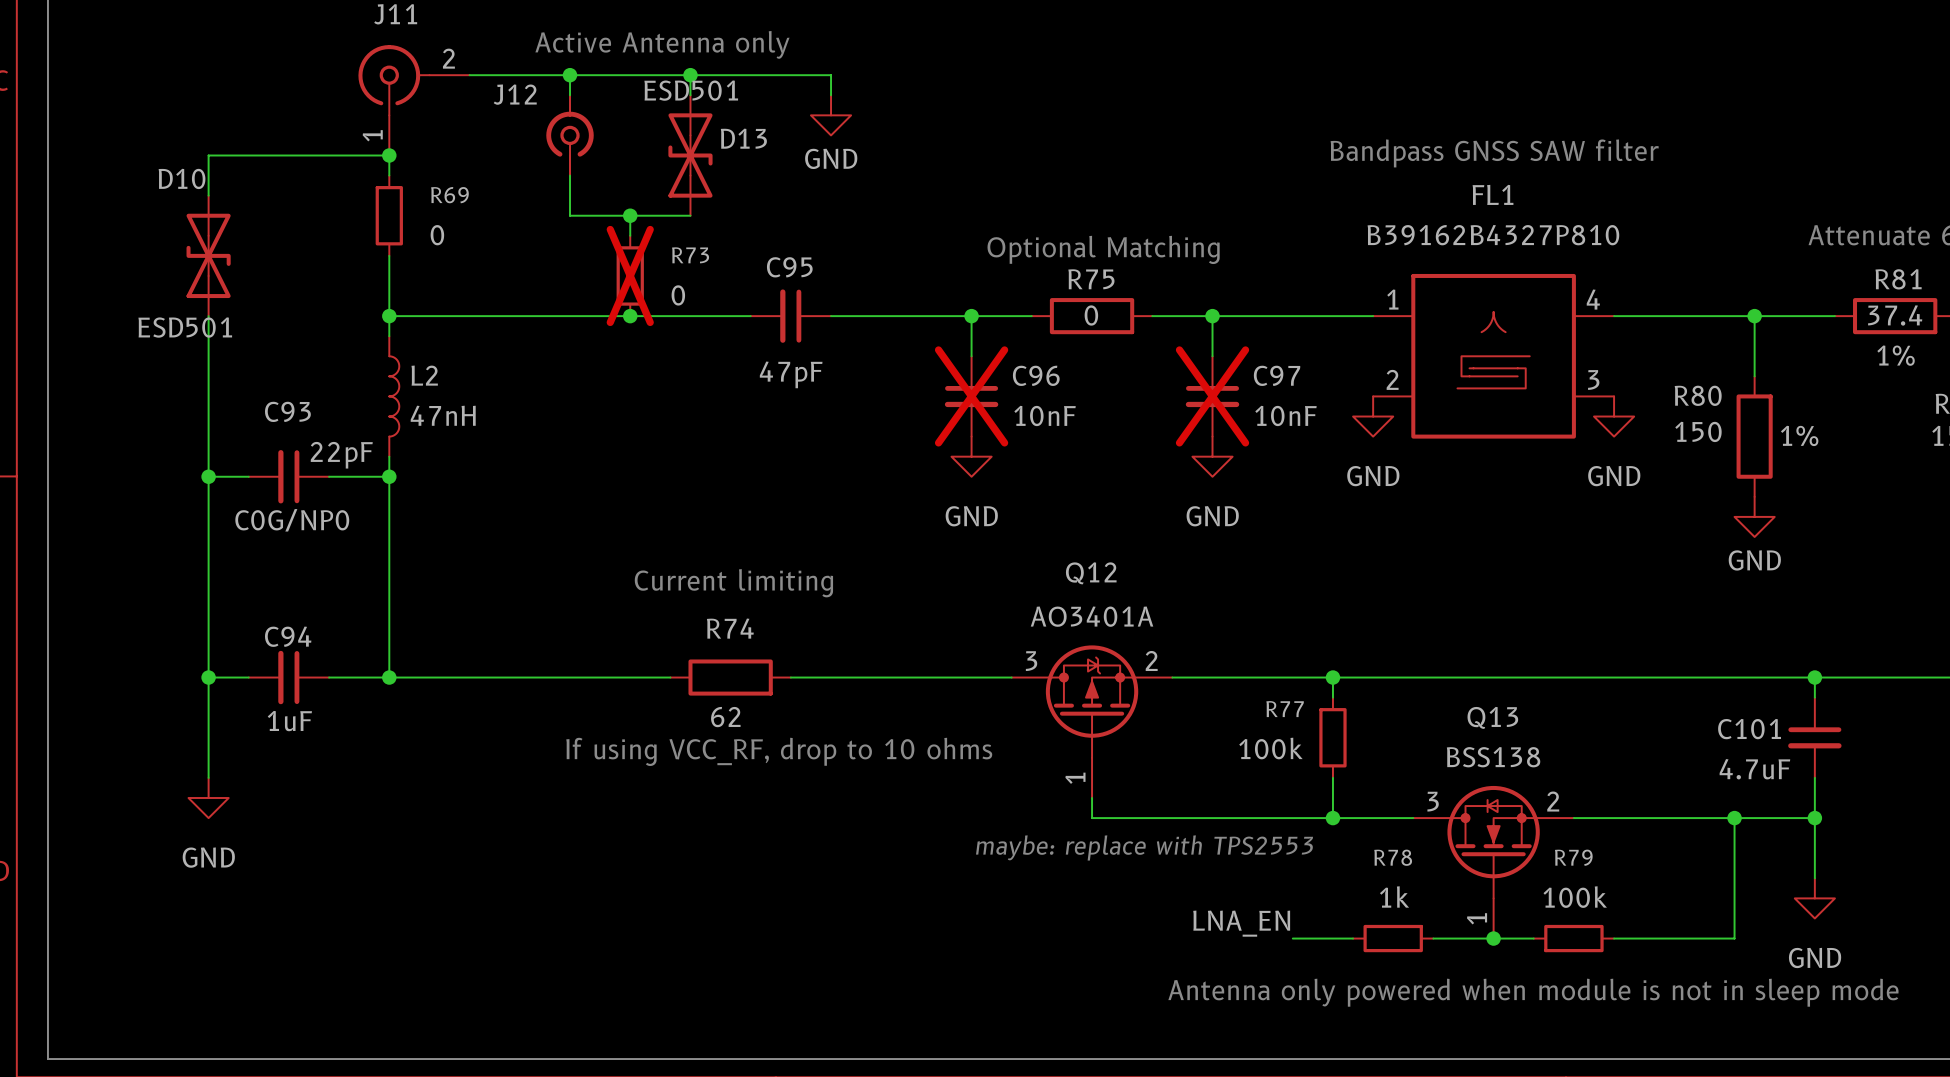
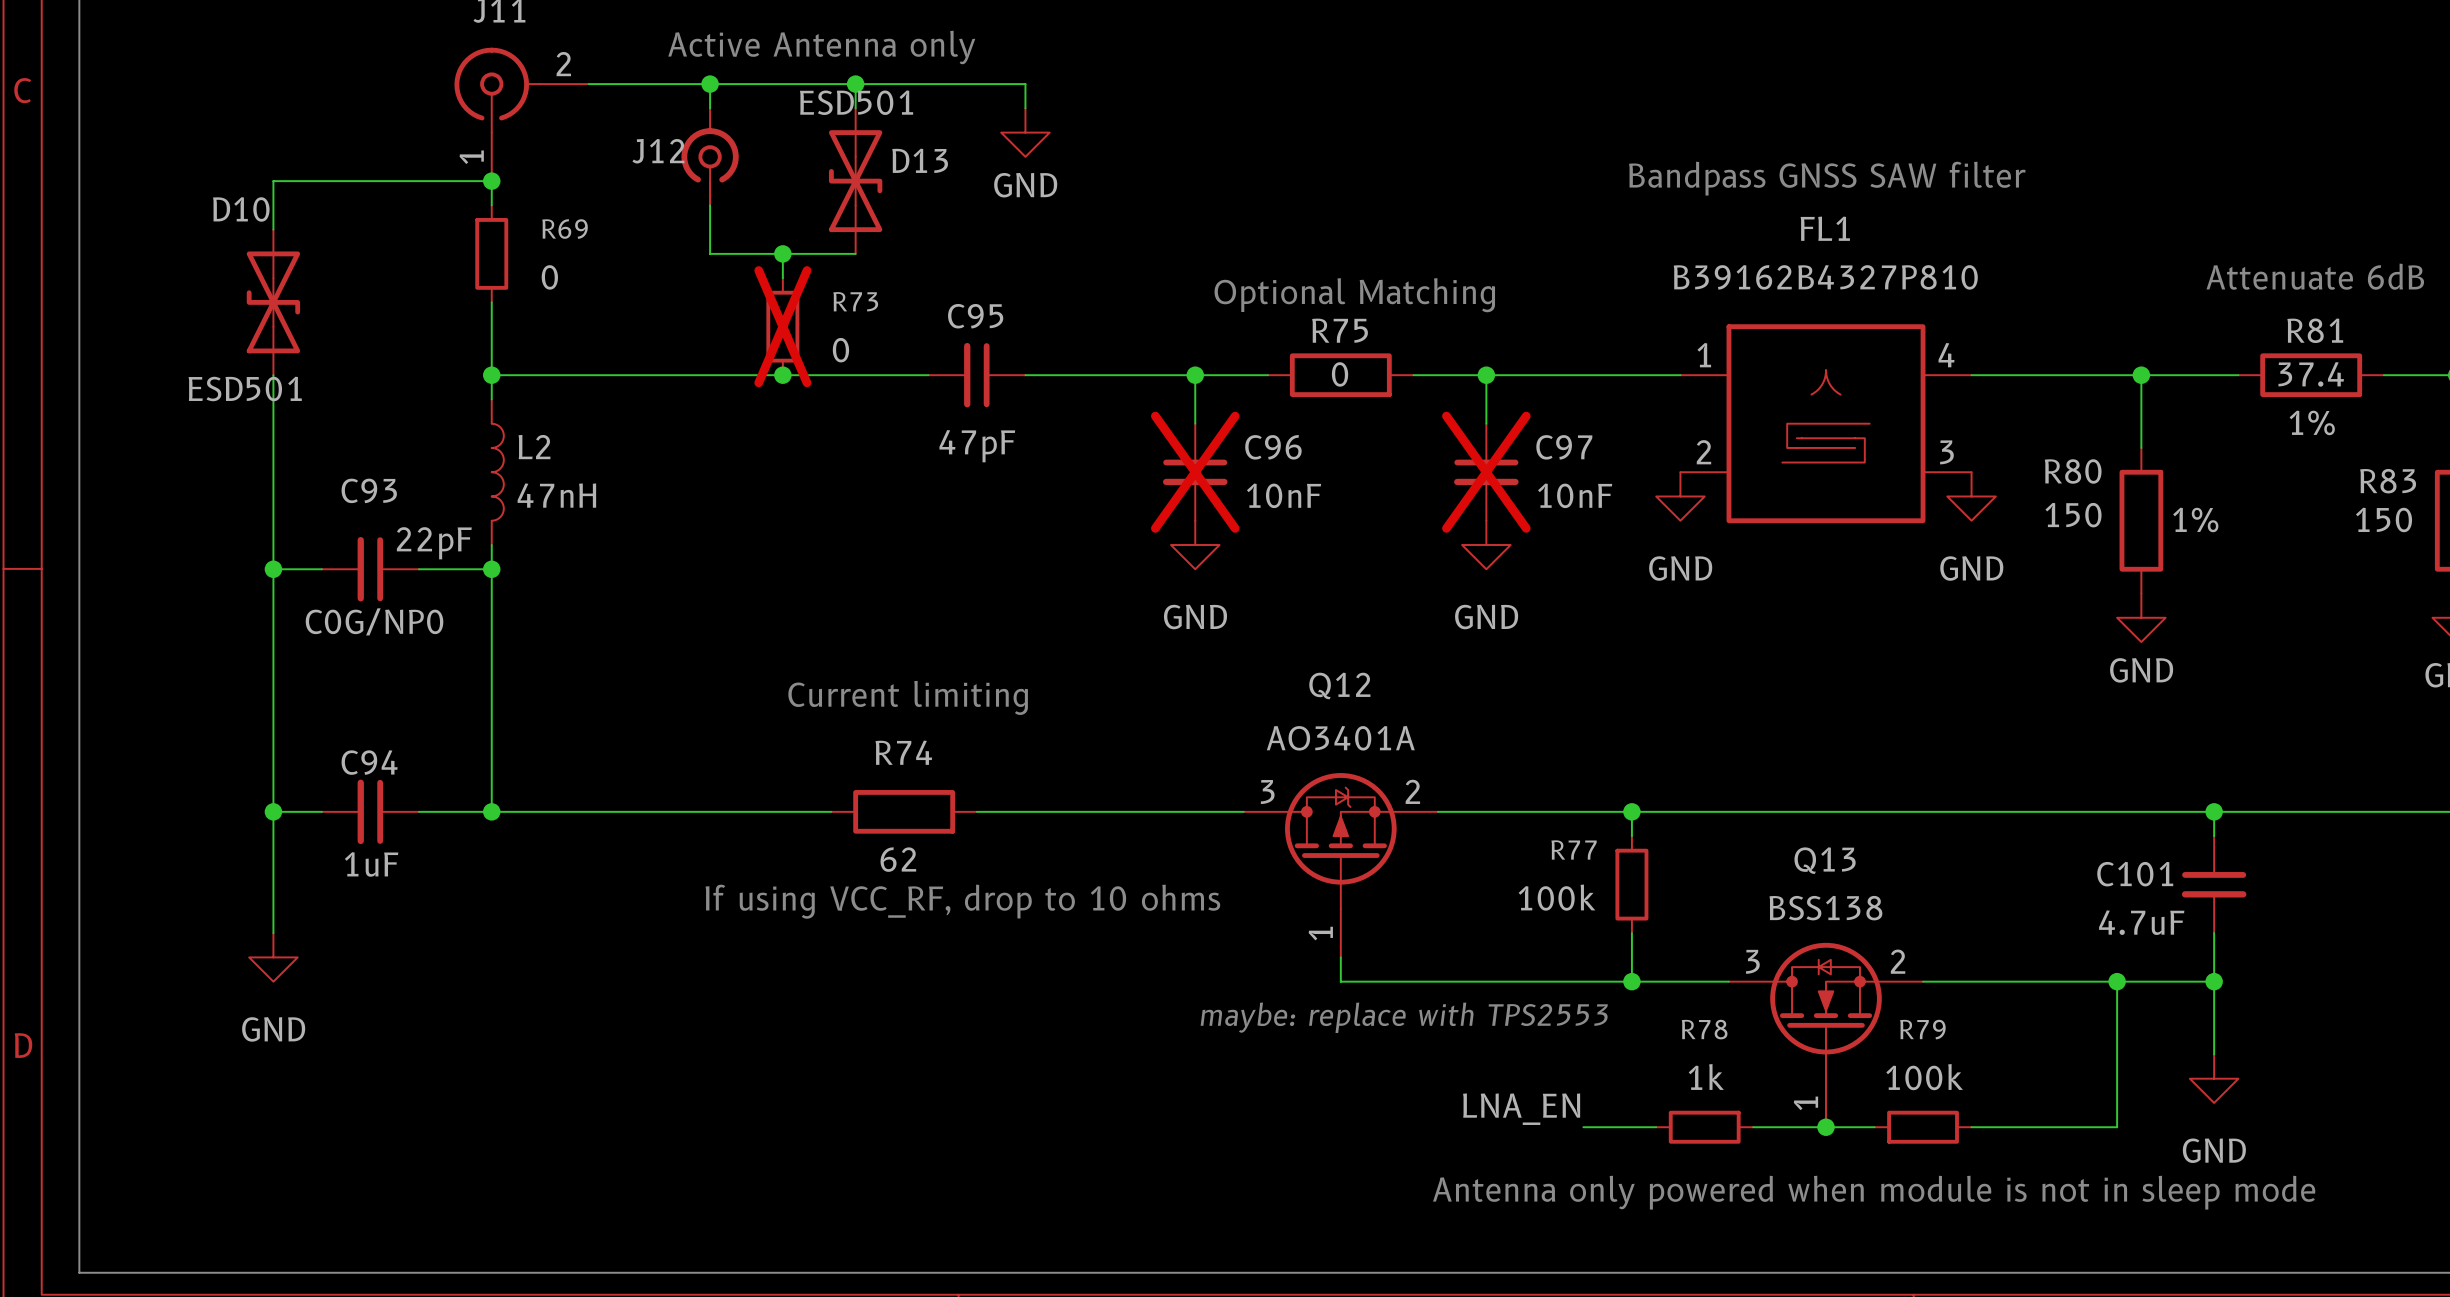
J12 name position: J12 (515, 94) -> J12 (658, 151)

